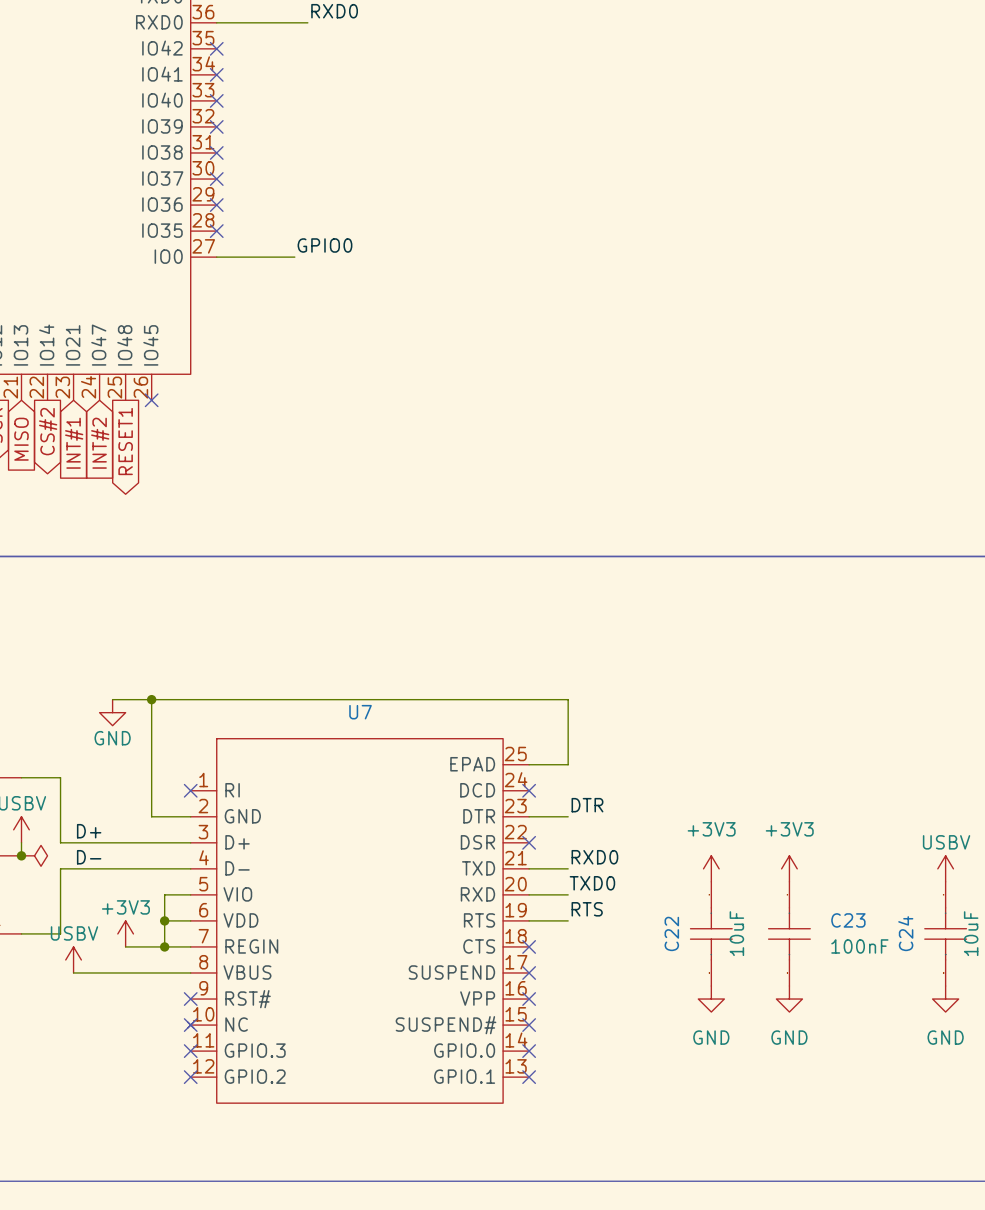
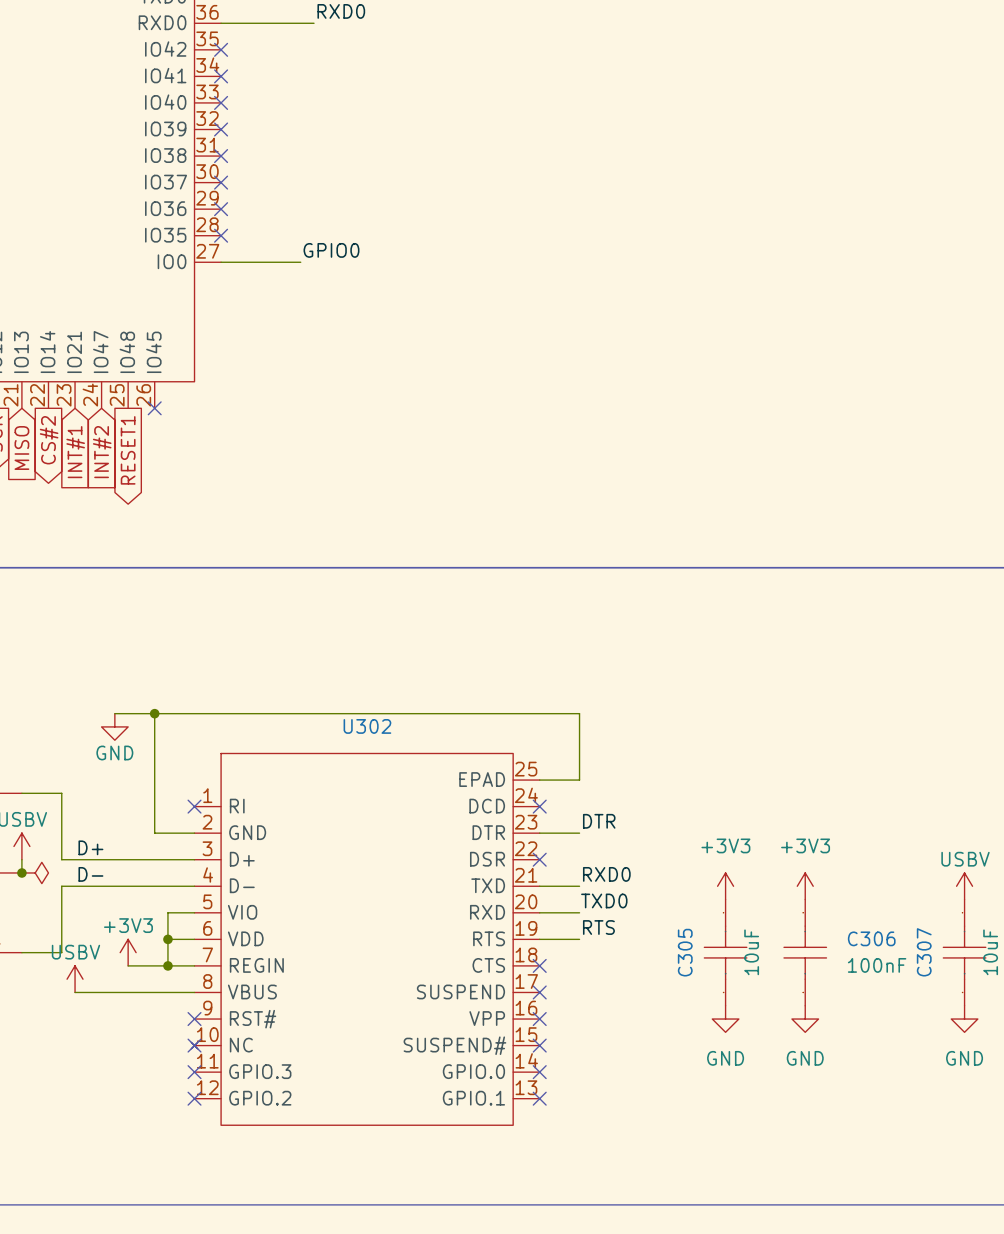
U7 name: U7 (360, 712) -> U302 (367, 726)
C23 name: C23 (848, 920) -> C306 (871, 938)
C22 name: C22 (671, 933) -> C305 (685, 952)
C24 name: C24 (905, 933) -> C307 (924, 952)

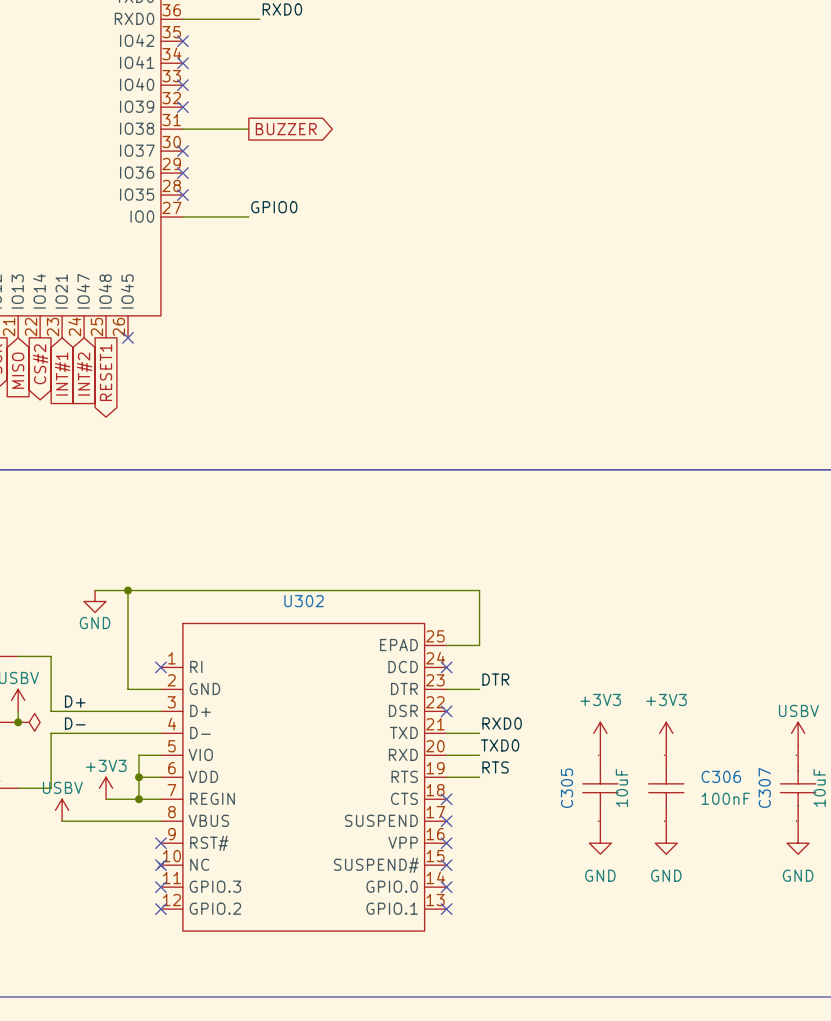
wire: none -> (182, 129) (248, 129)
no-connect mark: (221, 156) -> none
global label: none -> BUZZER (286, 129)

